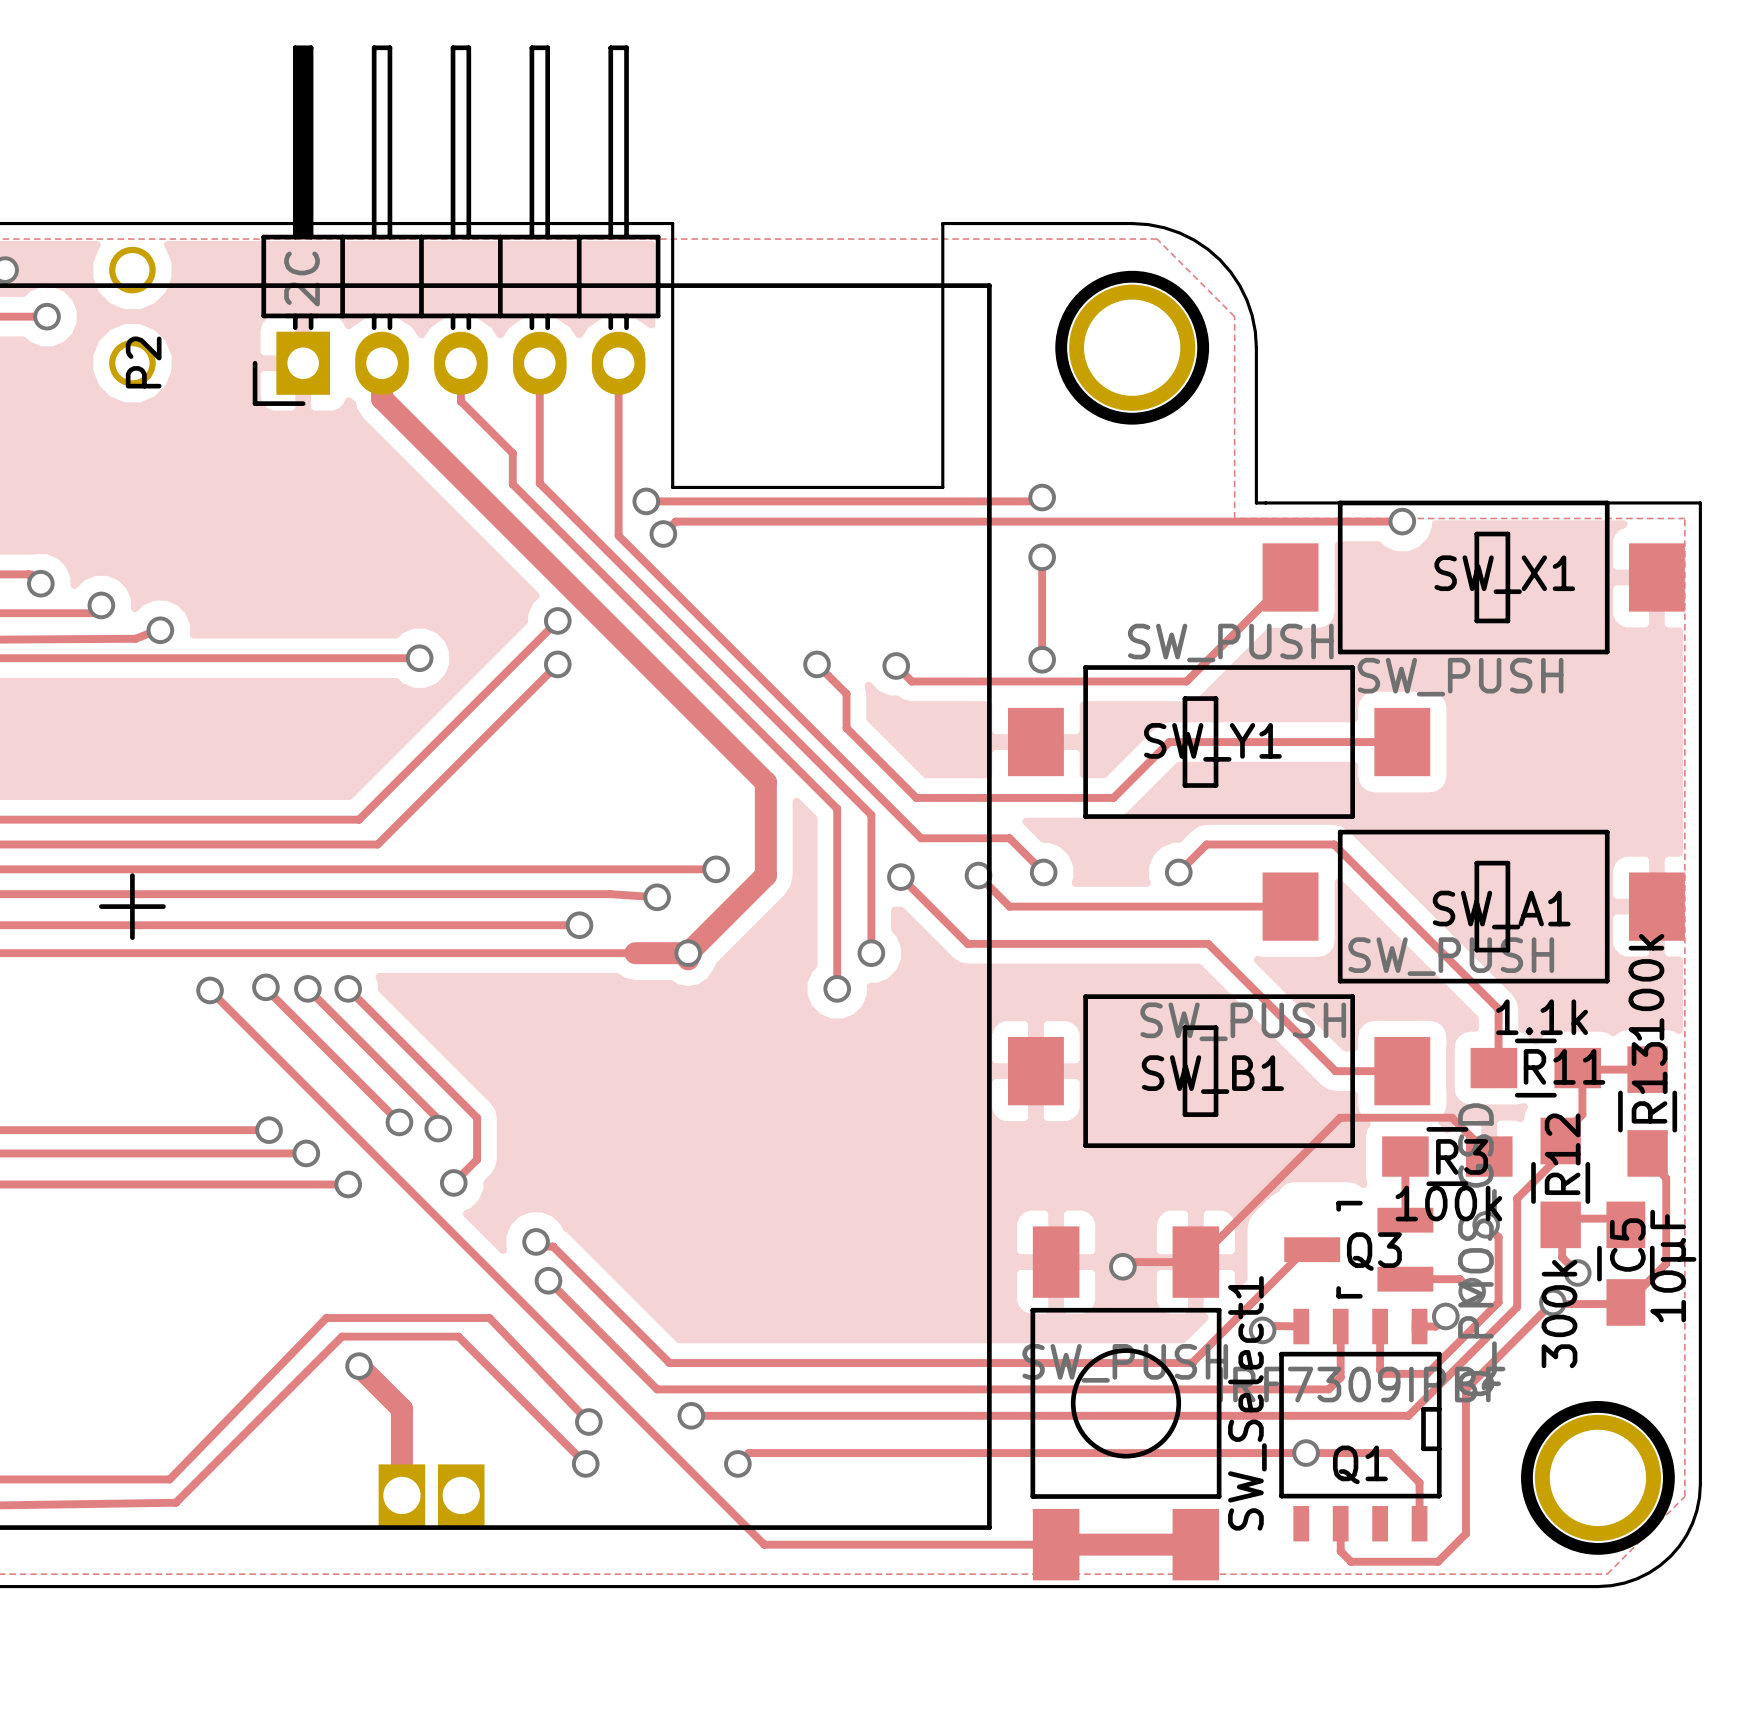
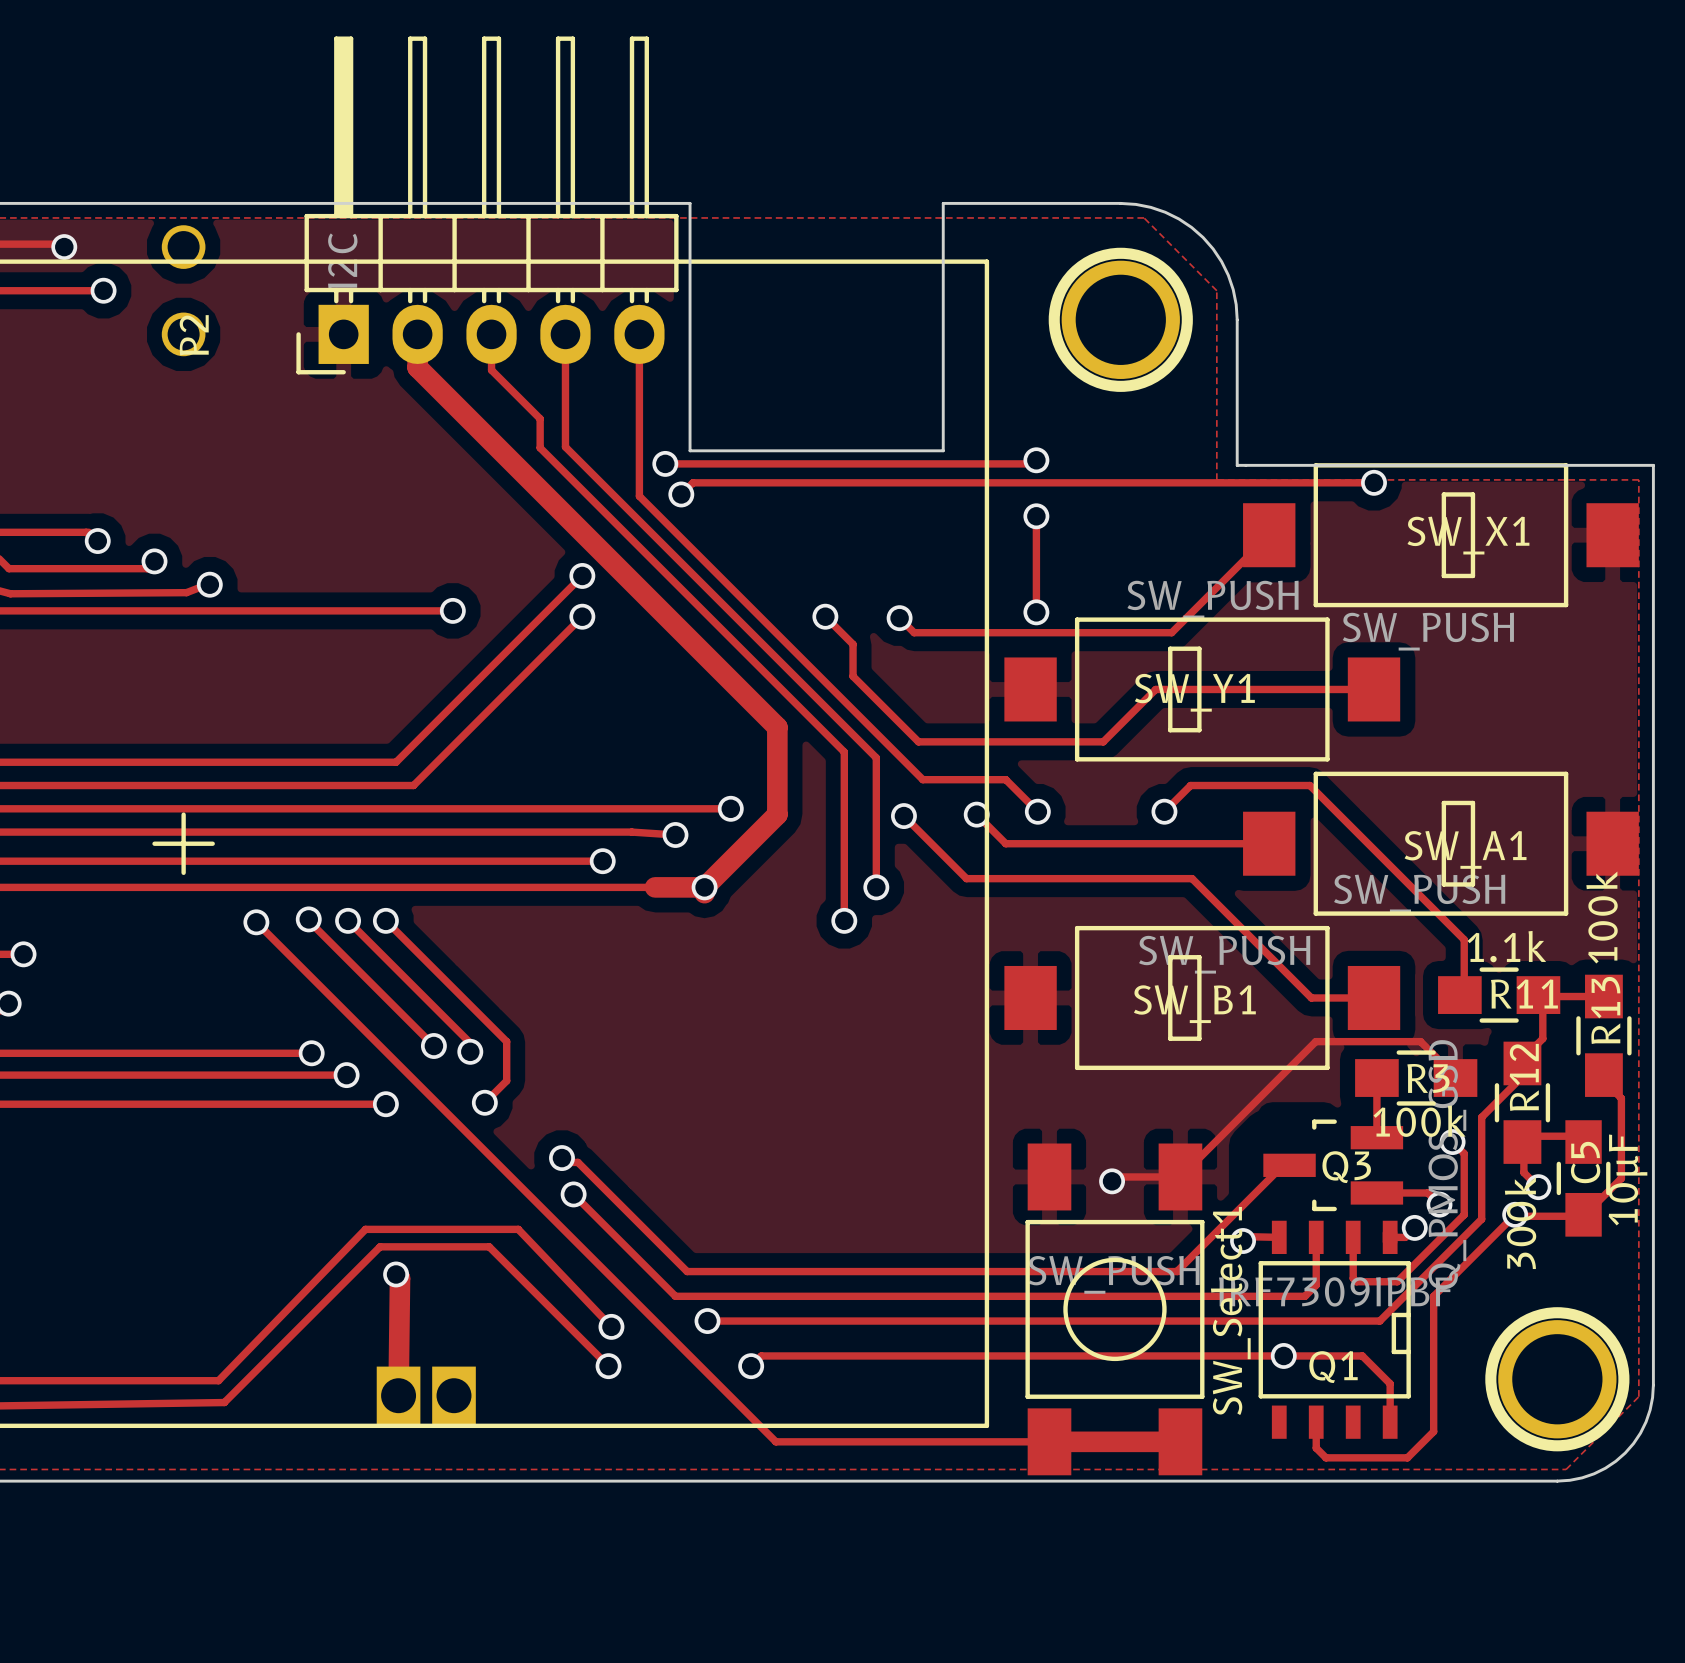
track: (363, 1370) (401, 1408) (401, 1495) -> (400, 1278) (398, 1395)
part position: (431, 1495) -> (426, 1395)

